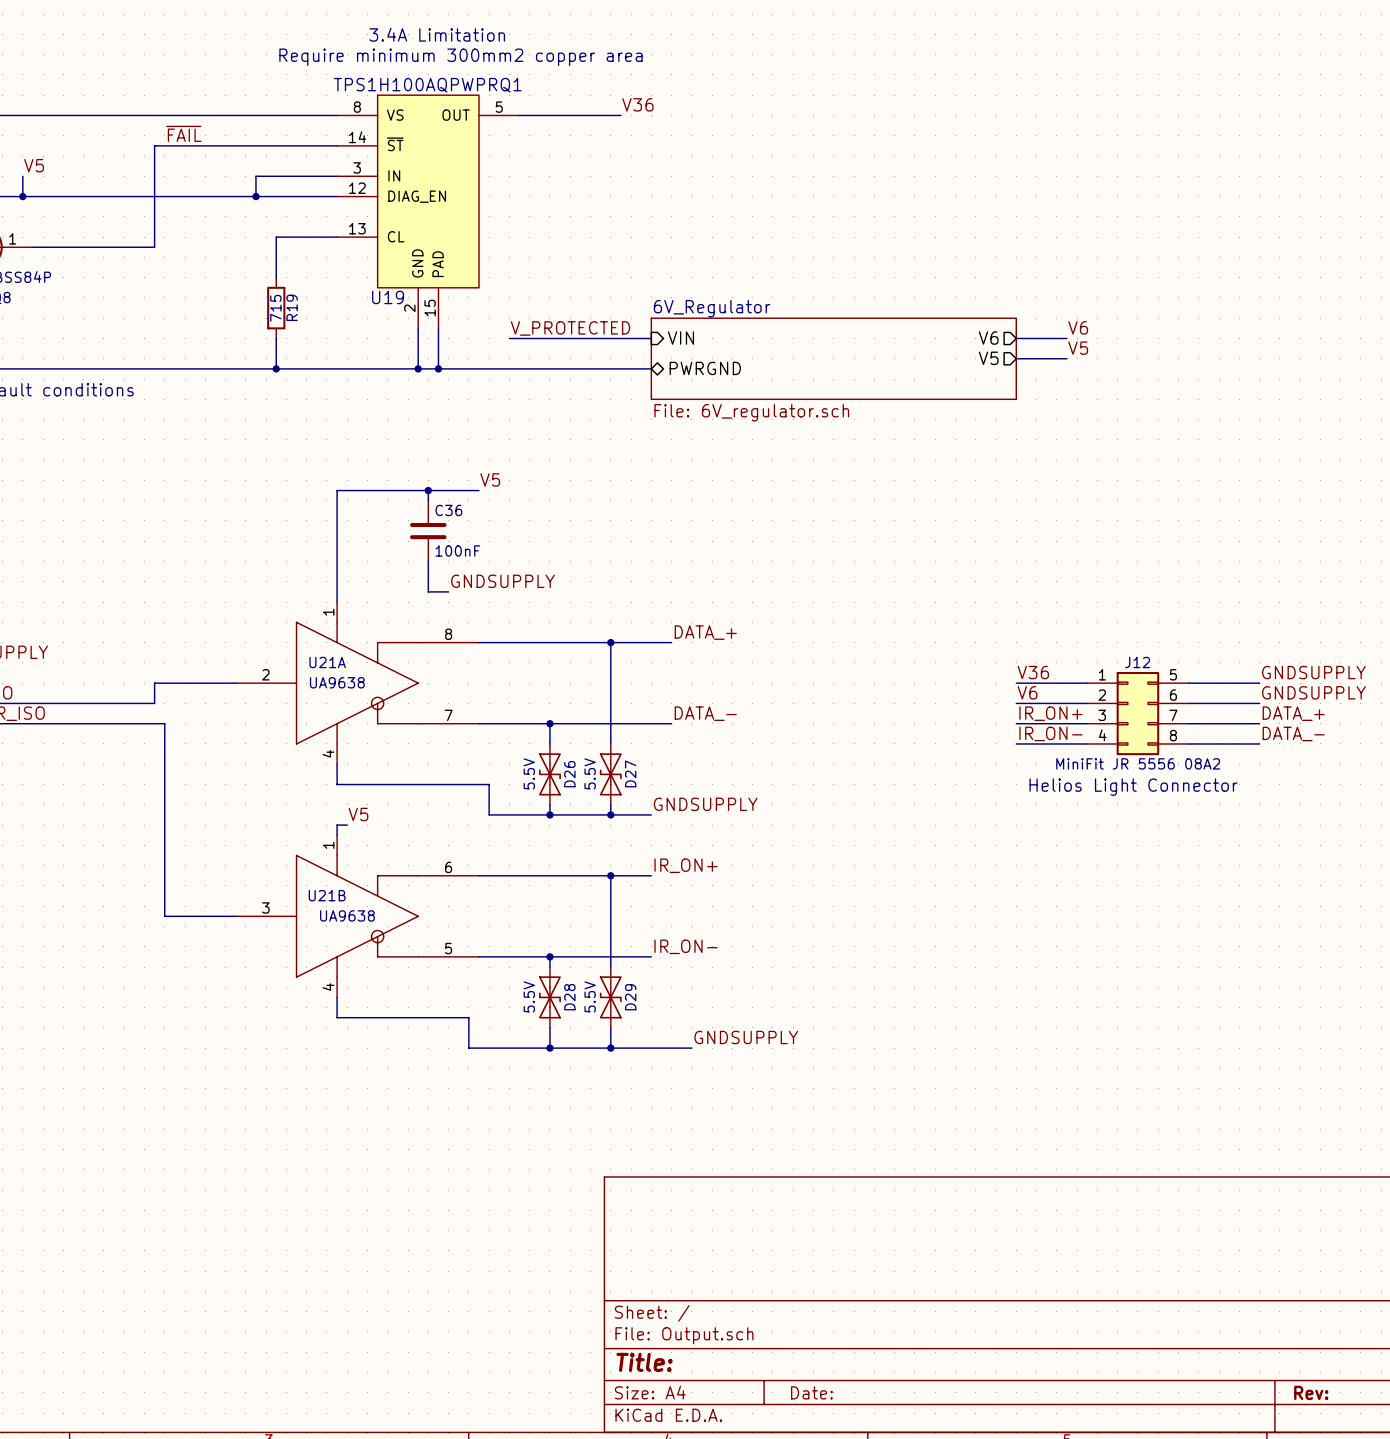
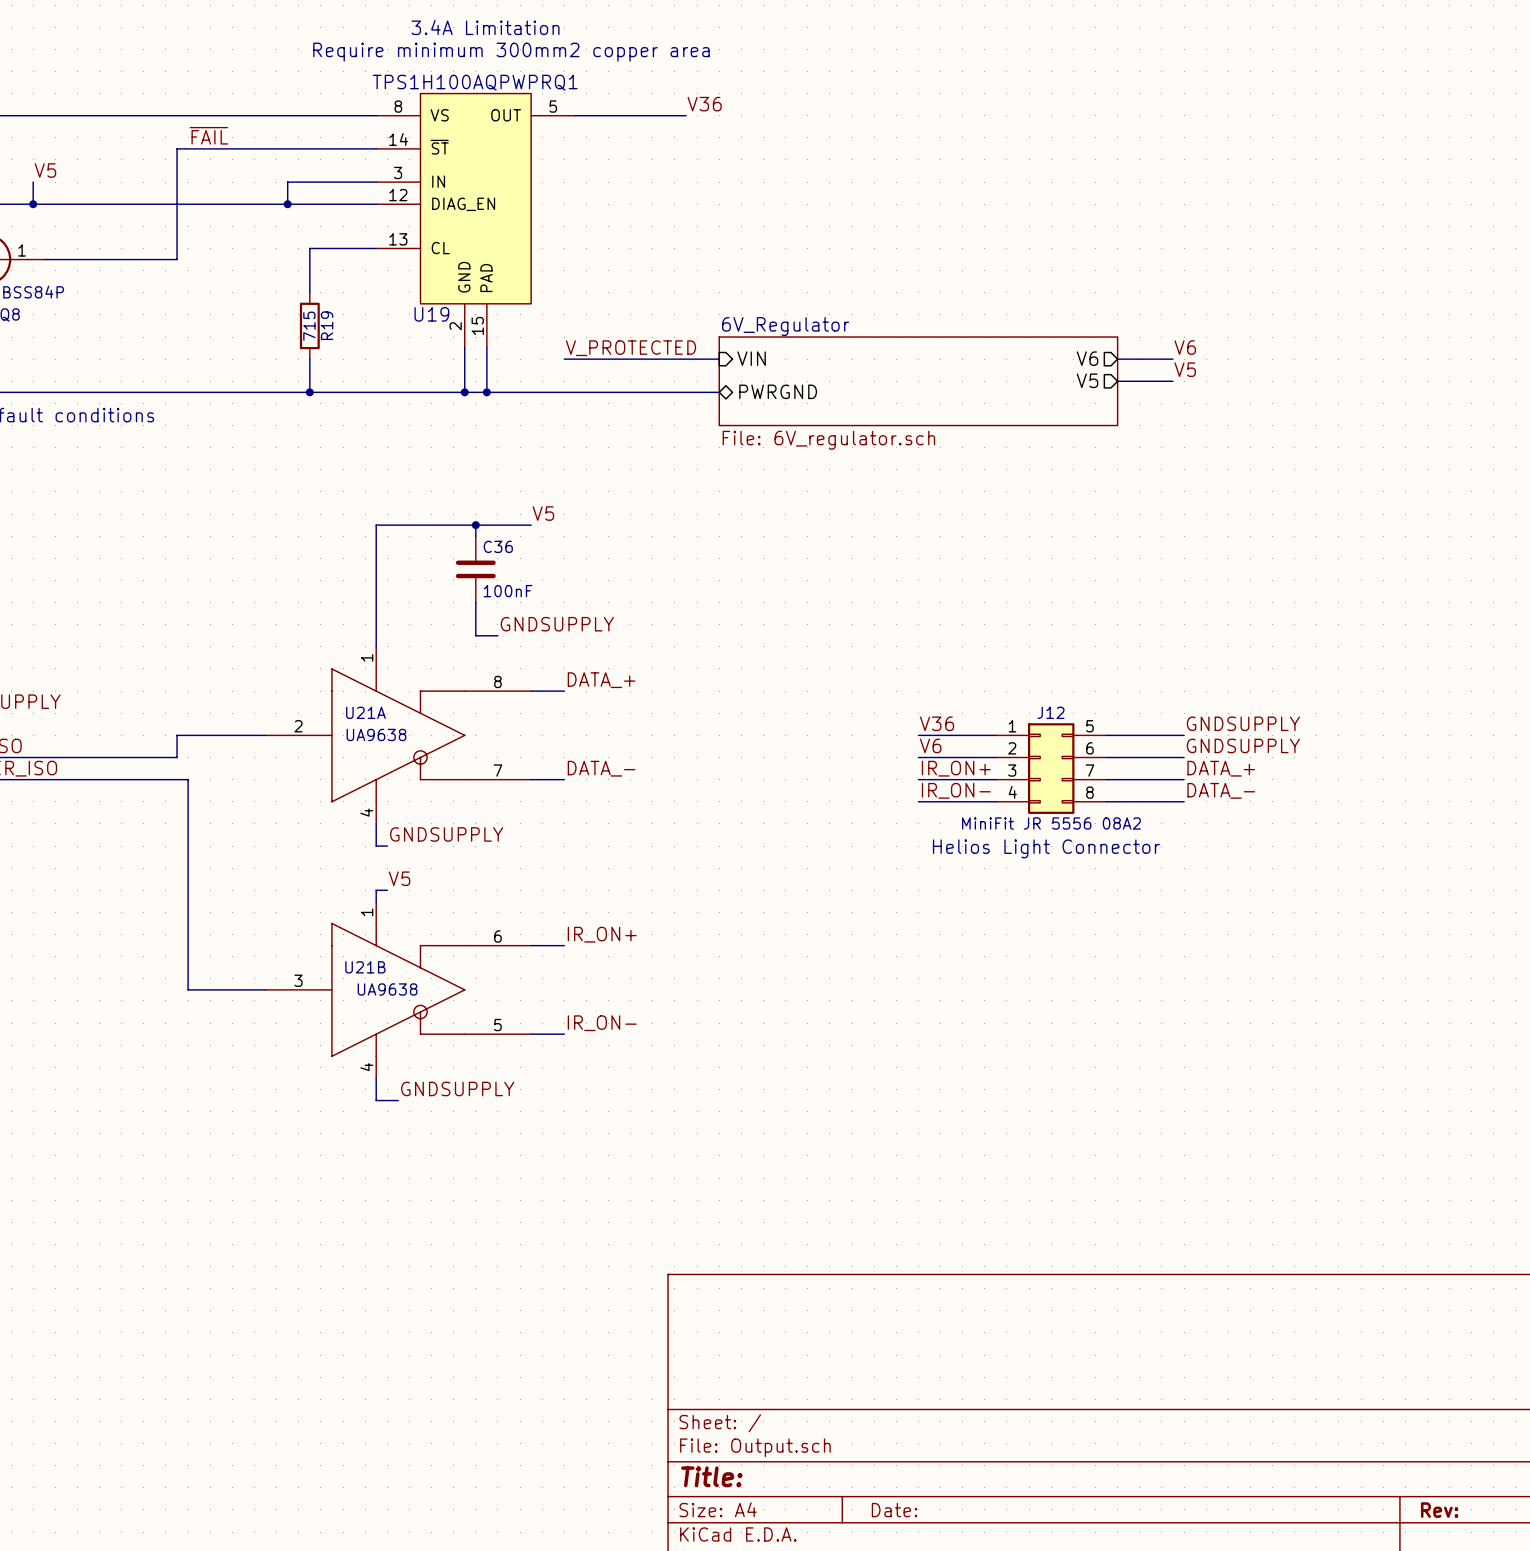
label position: DATA_+ (705, 632) -> DATA_+ (601, 680)
wire: (509, 642) (671, 642) -> none
wire: (610, 642) (610, 743) -> none
junction: (610, 642) -> none
label position: V36 (1033, 672) -> V36 (937, 723)
label: none -> GNDSUPPLY (1243, 723)
label: GNDSUPPLY (1313, 672) -> none
wire: none -> (918, 735) (995, 735)
wire: (1077, 683) (1087, 683) -> (1106, 735) (1117, 735)
wire: (1188, 683) (1259, 683) -> none
label position: V6 (1027, 692) -> V6 (930, 745)
label: none -> GNDSUPPLY (1243, 745)
label: GNDSUPPLY (1313, 692) -> none
wire: none -> (918, 757) (995, 757)
wire: (1077, 703) (1087, 703) -> (1106, 757) (1117, 757)
wire: (1188, 703) (1259, 703) -> none
label position: DATA_- (705, 713) -> DATA_- (601, 768)
label: none -> IR_ON+ (956, 768)
label: IR_ON+ (1050, 713) -> none
J12 position: (1137, 713) -> (1051, 768)
label position: DATA_+ (1293, 713) -> DATA_+ (1221, 768)
wire: (509, 723) (671, 723) -> none
wire: (549, 723) (549, 743) -> none
junction: (549, 723) -> none
wire: none -> (918, 779) (995, 779)
wire: (1077, 723) (1087, 723) -> (1106, 779) (1117, 779)
wire: (1188, 723) (1259, 723) -> none
label: none -> IR_ON- (956, 790)
label: IR_ON- (1050, 733) -> none
label position: DATA_- (1293, 733) -> DATA_- (1221, 790)
wire: none -> (918, 801) (995, 801)
wire: (1077, 743) (1087, 743) -> (1106, 801) (1117, 801)
wire: (1188, 743) (1259, 743) -> none
label: none -> GNDSUPPLY (446, 834)
D26: 5.5V (549, 774) -> none
D27: 5.5V (610, 774) -> none
wire: (347, 784) (489, 784) (489, 814) (651, 814) -> none
text position: Helios Light Connector (1133, 787) -> Helios Light Connector (1046, 848)
wire: (549, 804) (549, 814) -> none
wire: (610, 804) (610, 814) -> none
label: GNDSUPPLY (705, 804) -> none
junction: (549, 814) -> none
junction: (610, 814) -> none
label: none -> IR_ON+ (602, 934)
label: IR_ON+ (686, 865) -> none
wire: (509, 875) (651, 875) -> none
wire: (610, 875) (610, 967) -> none
junction: (610, 875) -> none
label: none -> IR_ON- (602, 1023)
label: IR_ON- (686, 946) -> none
wire: (509, 956) (651, 956) -> none
wire: (549, 956) (549, 967) -> none
junction: (549, 956) -> none
D28: 5.5V (549, 997) -> none
D29: 5.5V (610, 997) -> none
label: none -> GNDSUPPLY (457, 1088)
wire: (357, 1017) (468, 1017) (468, 1048) (691, 1048) -> none
wire: (549, 1027) (549, 1048) -> none
wire: (610, 1027) (610, 1048) -> none
label: GNDSUPPLY (746, 1037) -> none
junction: (549, 1048) -> none
junction: (610, 1048) -> none

